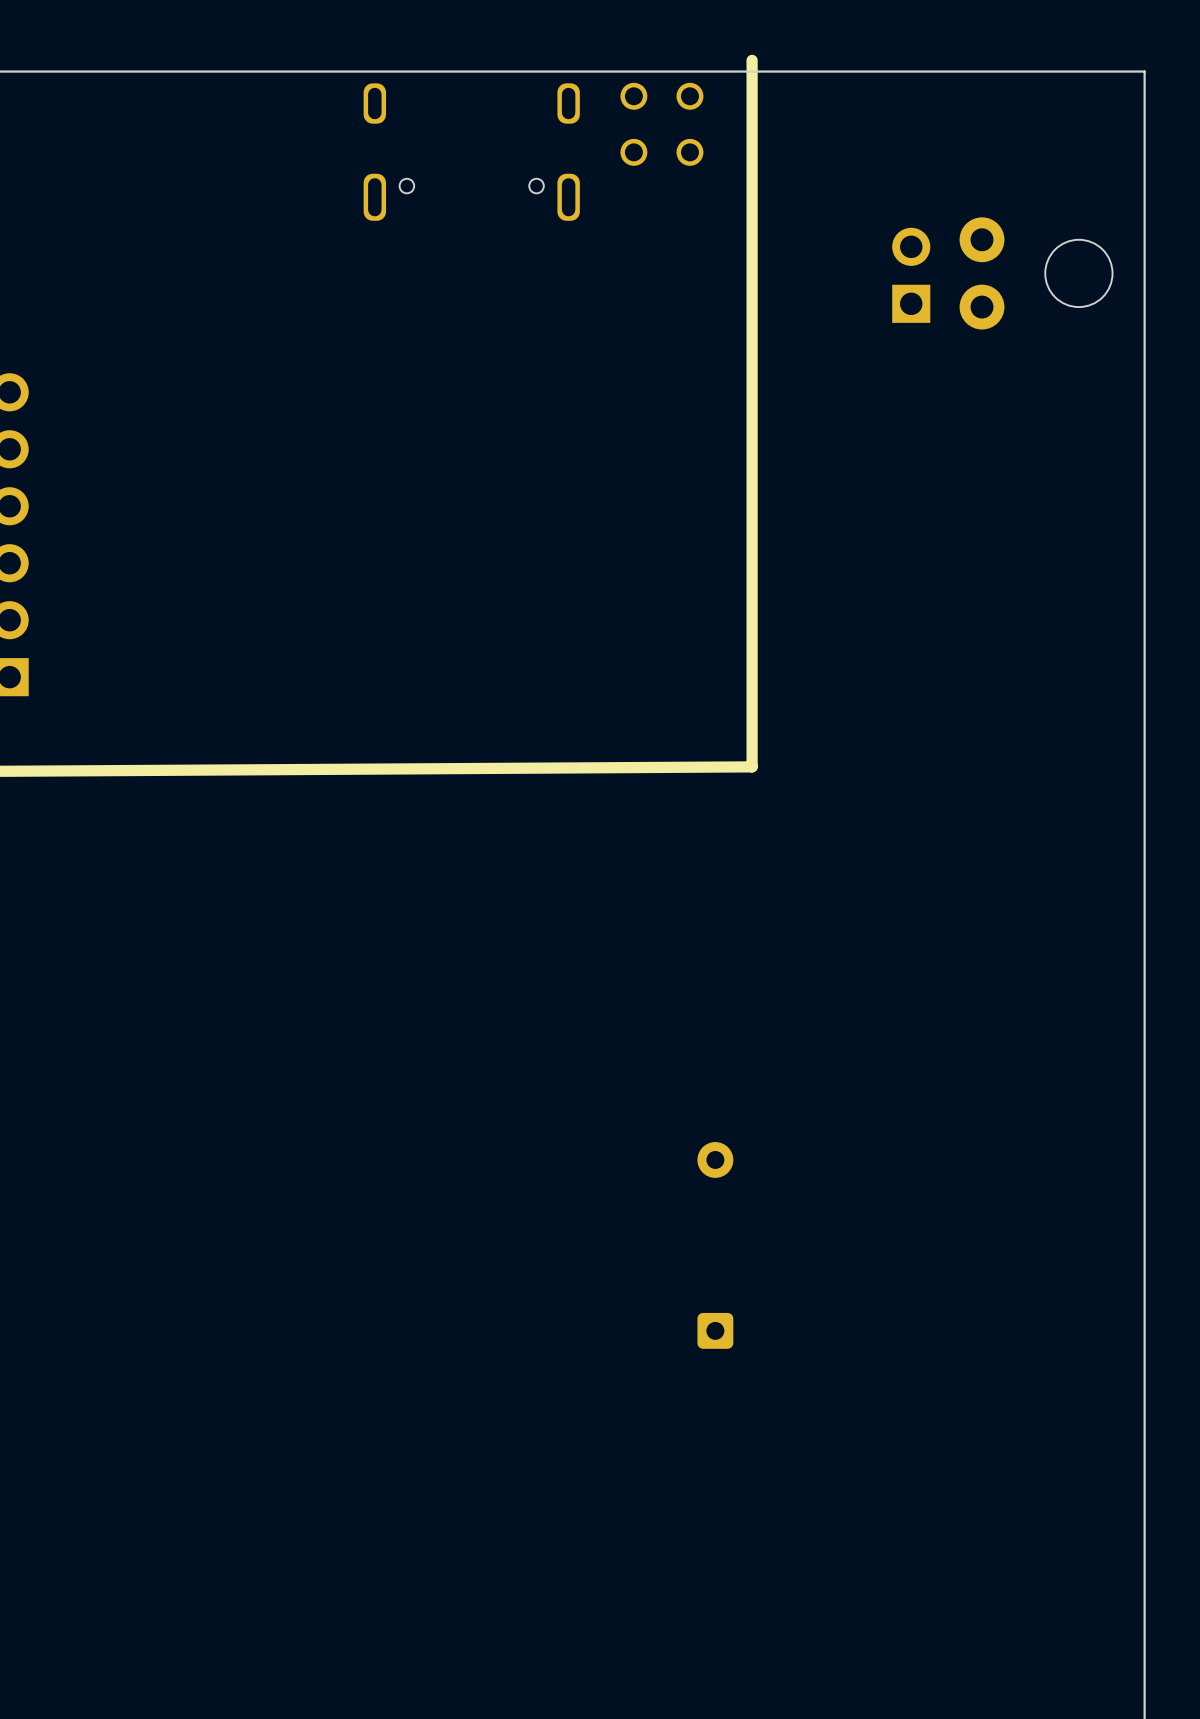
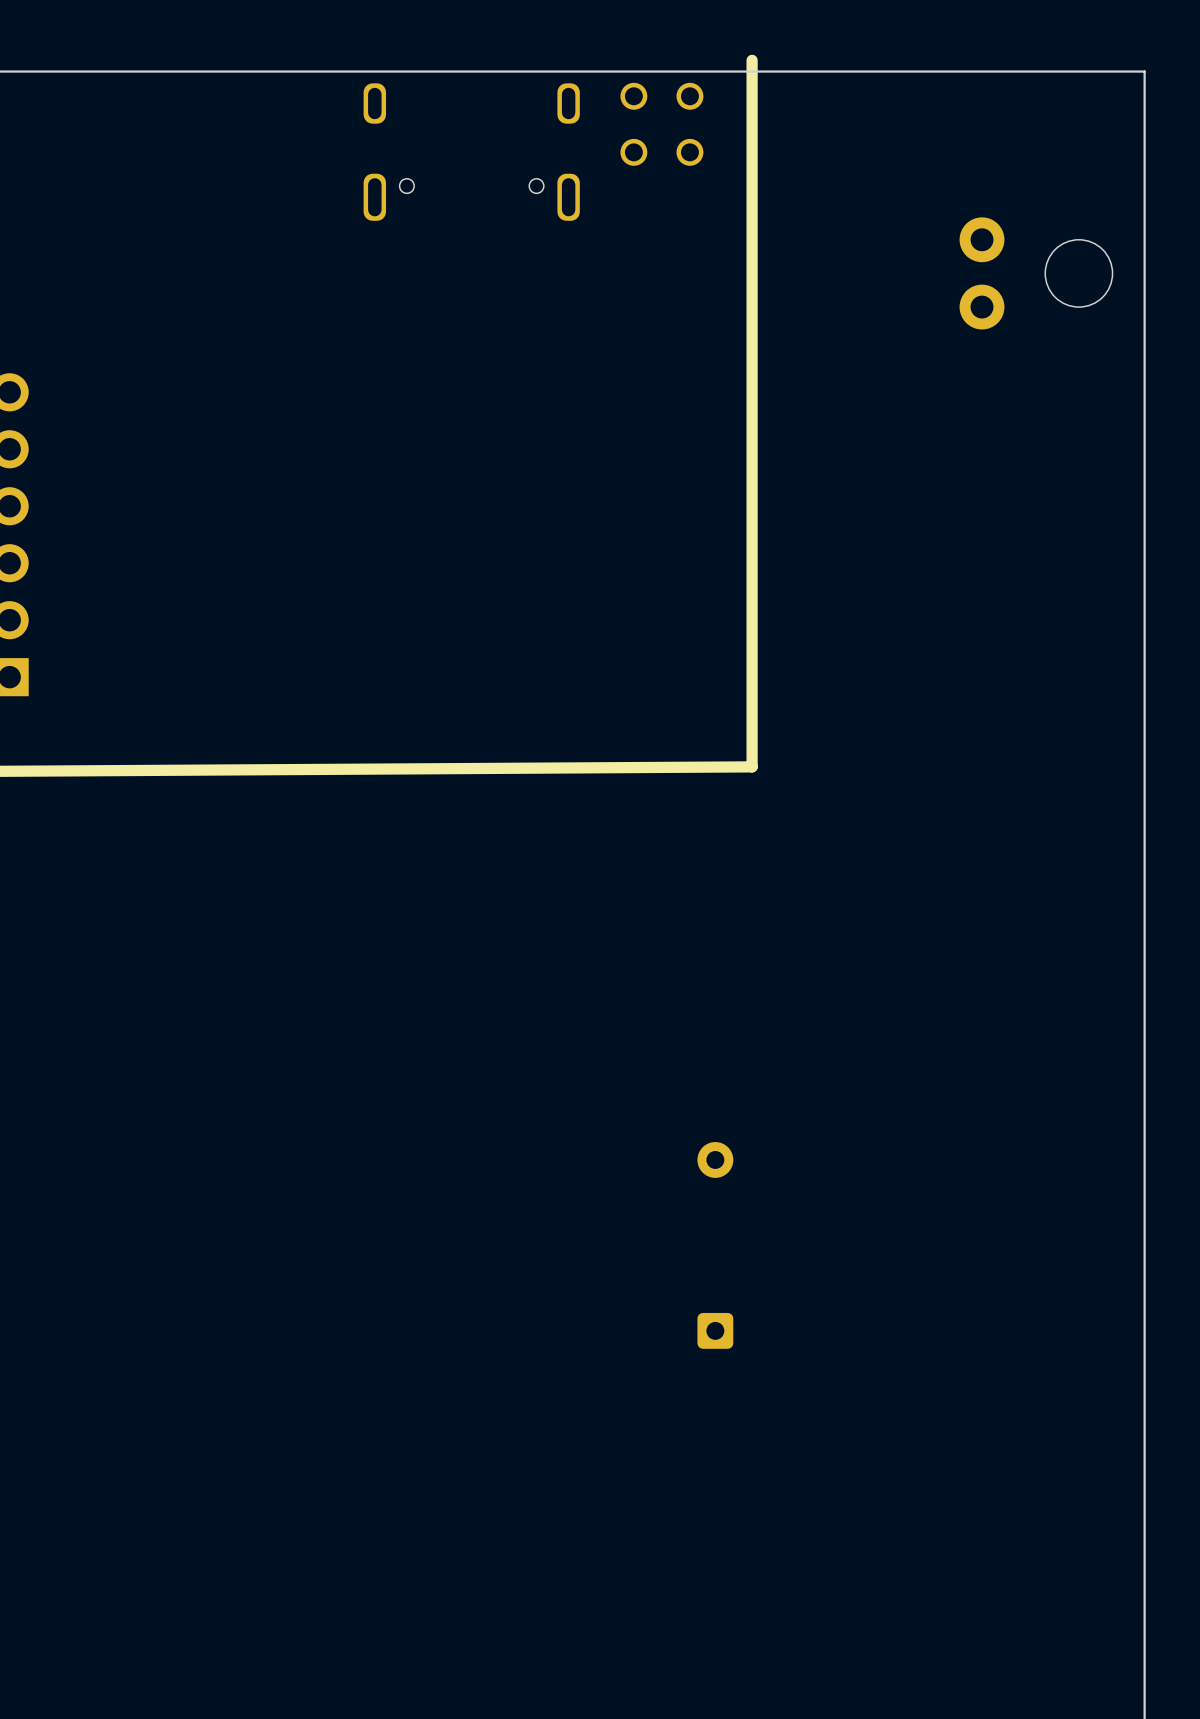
part: (911, 275) -> none

